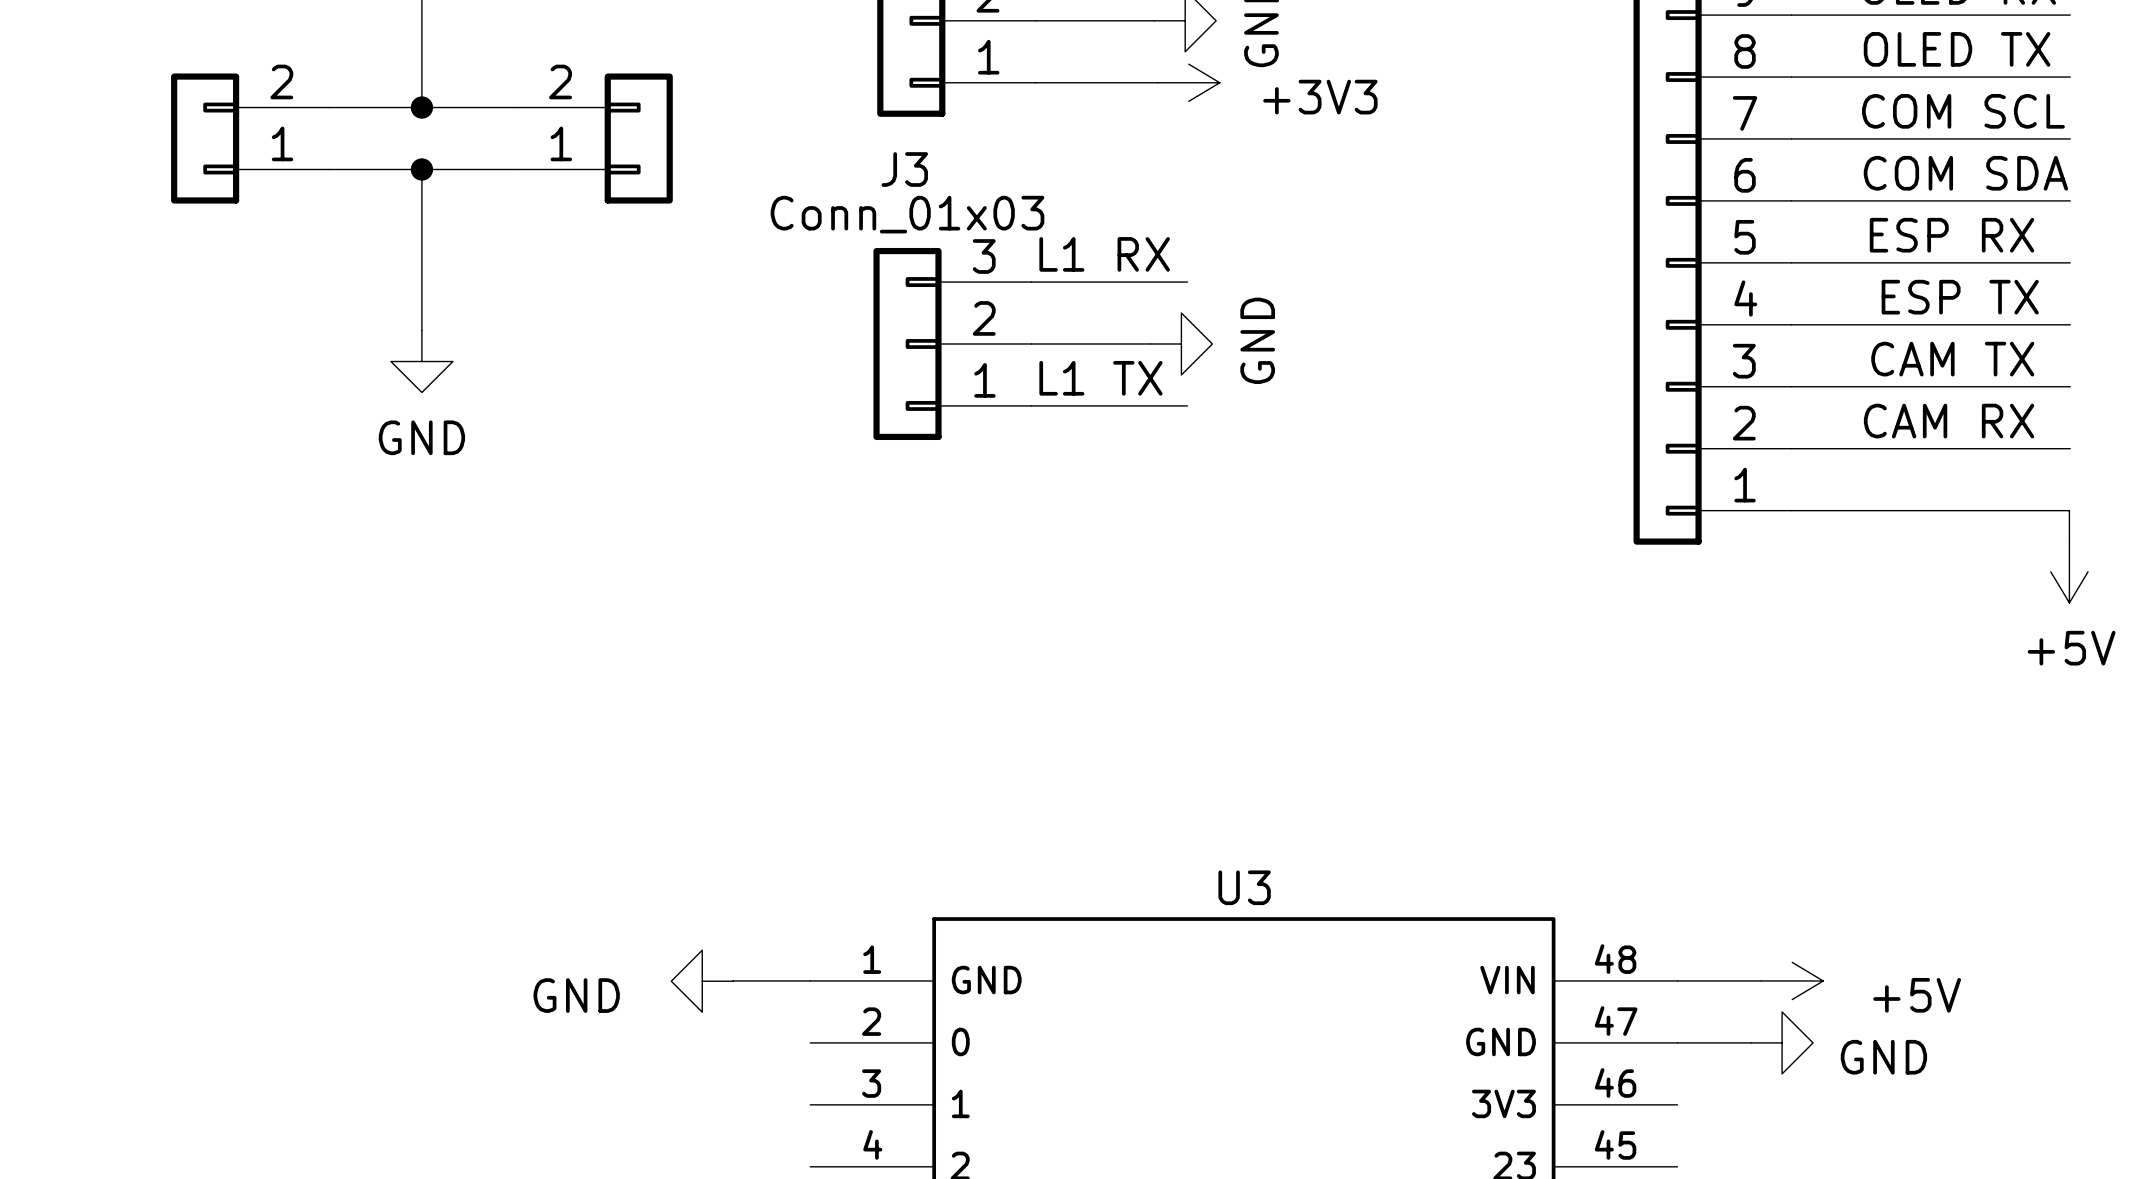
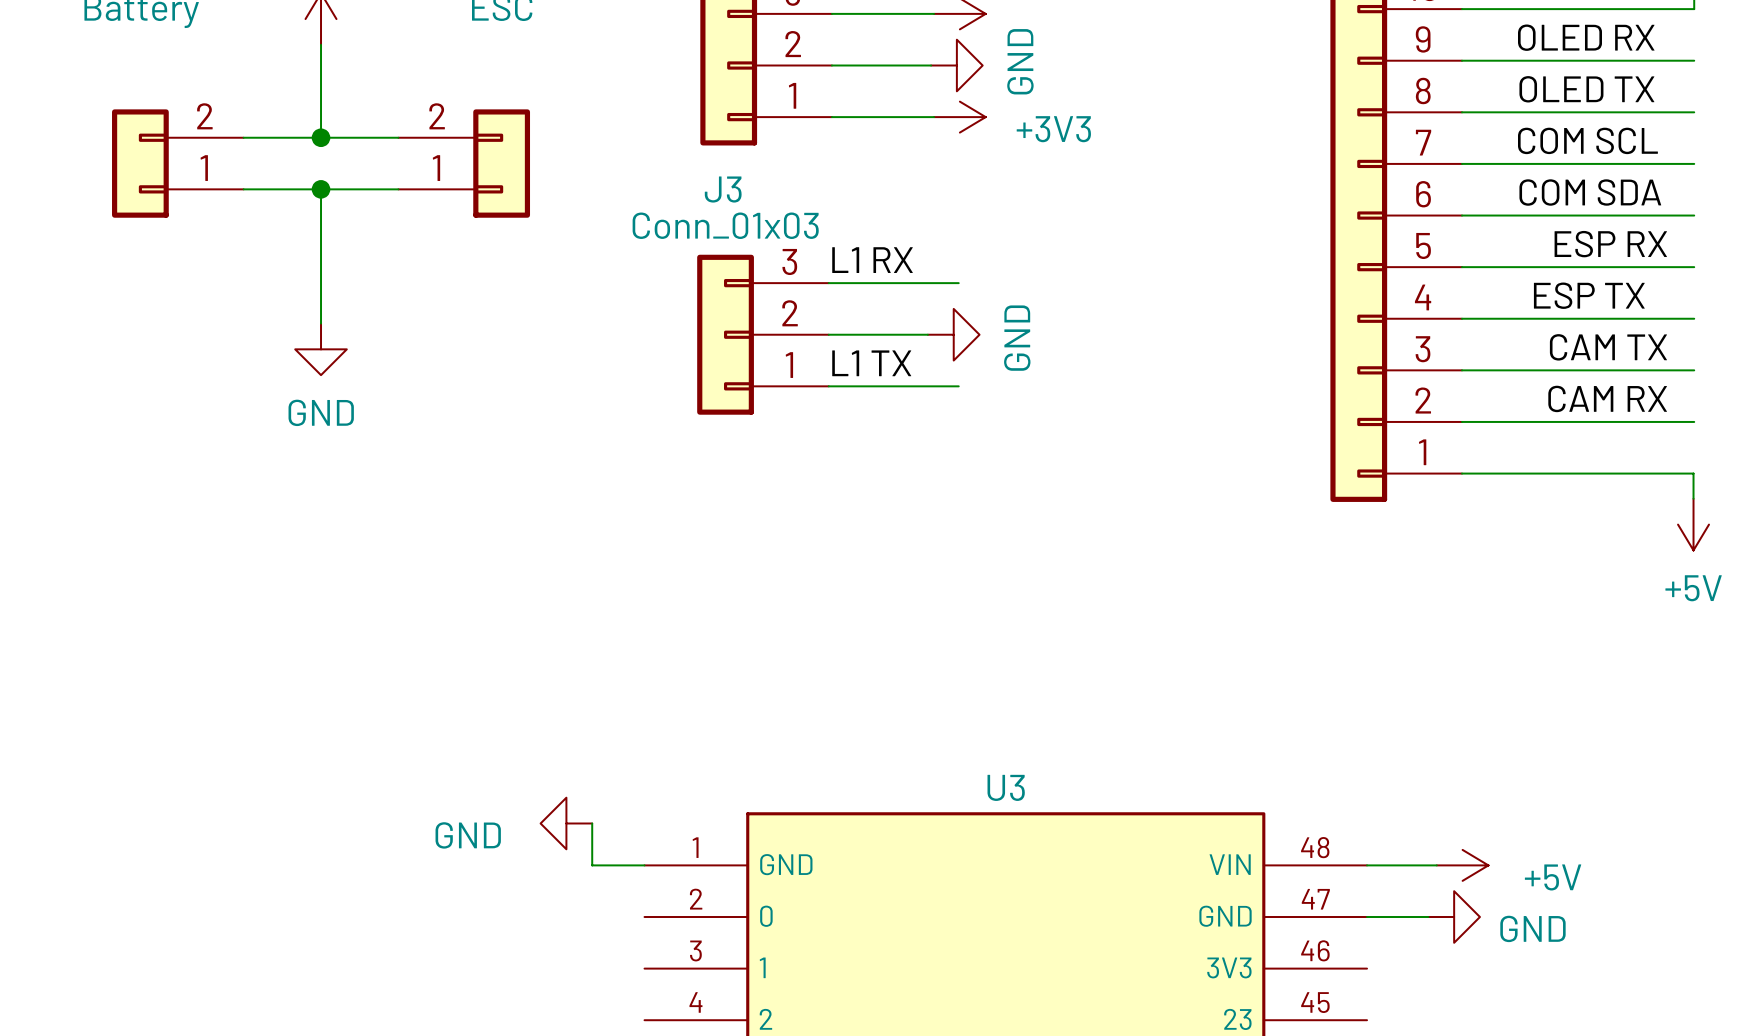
wire: (733, 980) (747, 980) -> (592, 823) (592, 865)
power symbol position: GND (702, 981) -> GND (566, 823)

